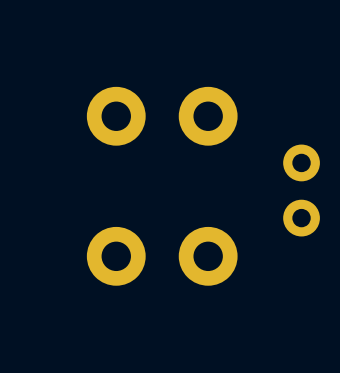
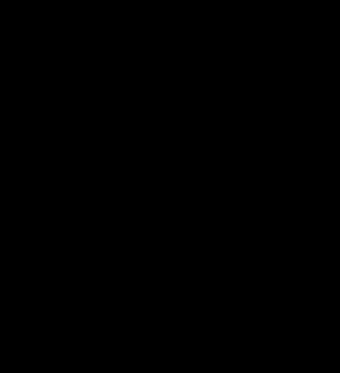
part: (162, 116) -> none
part: (301, 190) -> none
part: (162, 256) -> none

